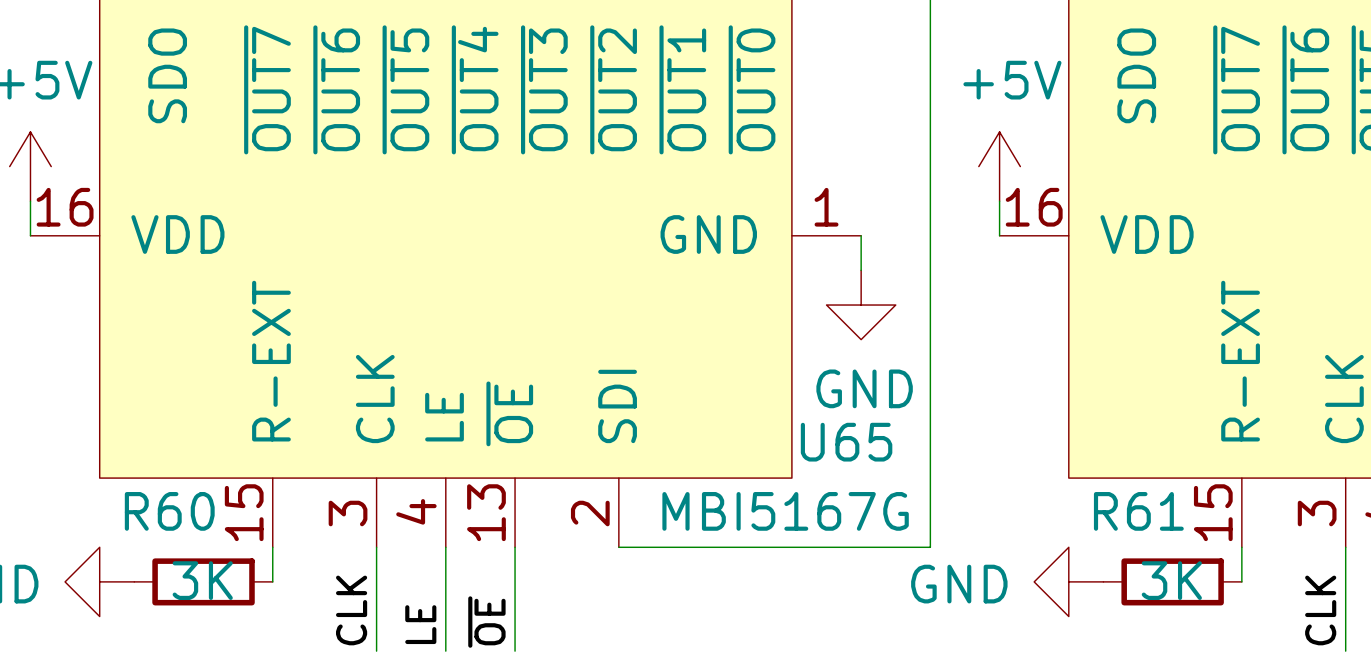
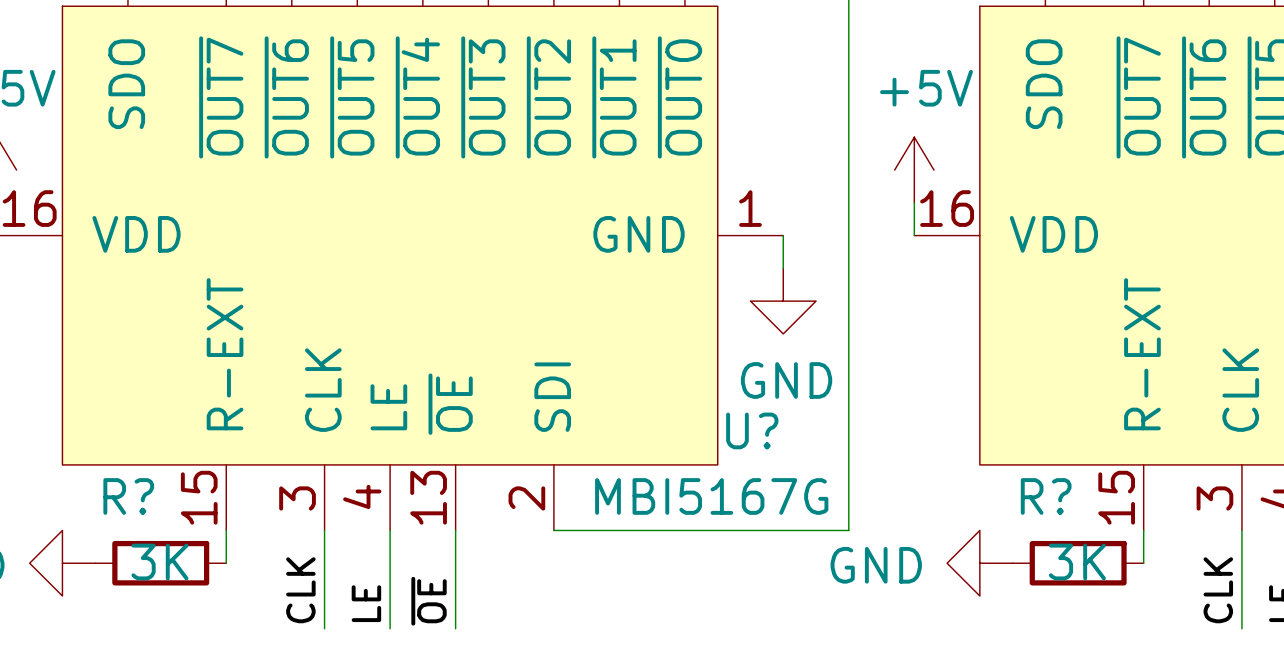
U65 name: U65 (846, 442) -> U? (752, 430)
R60 name: R60 (169, 511) -> R? (128, 496)
R61 name: R61 (1138, 511) -> R? (1046, 496)

